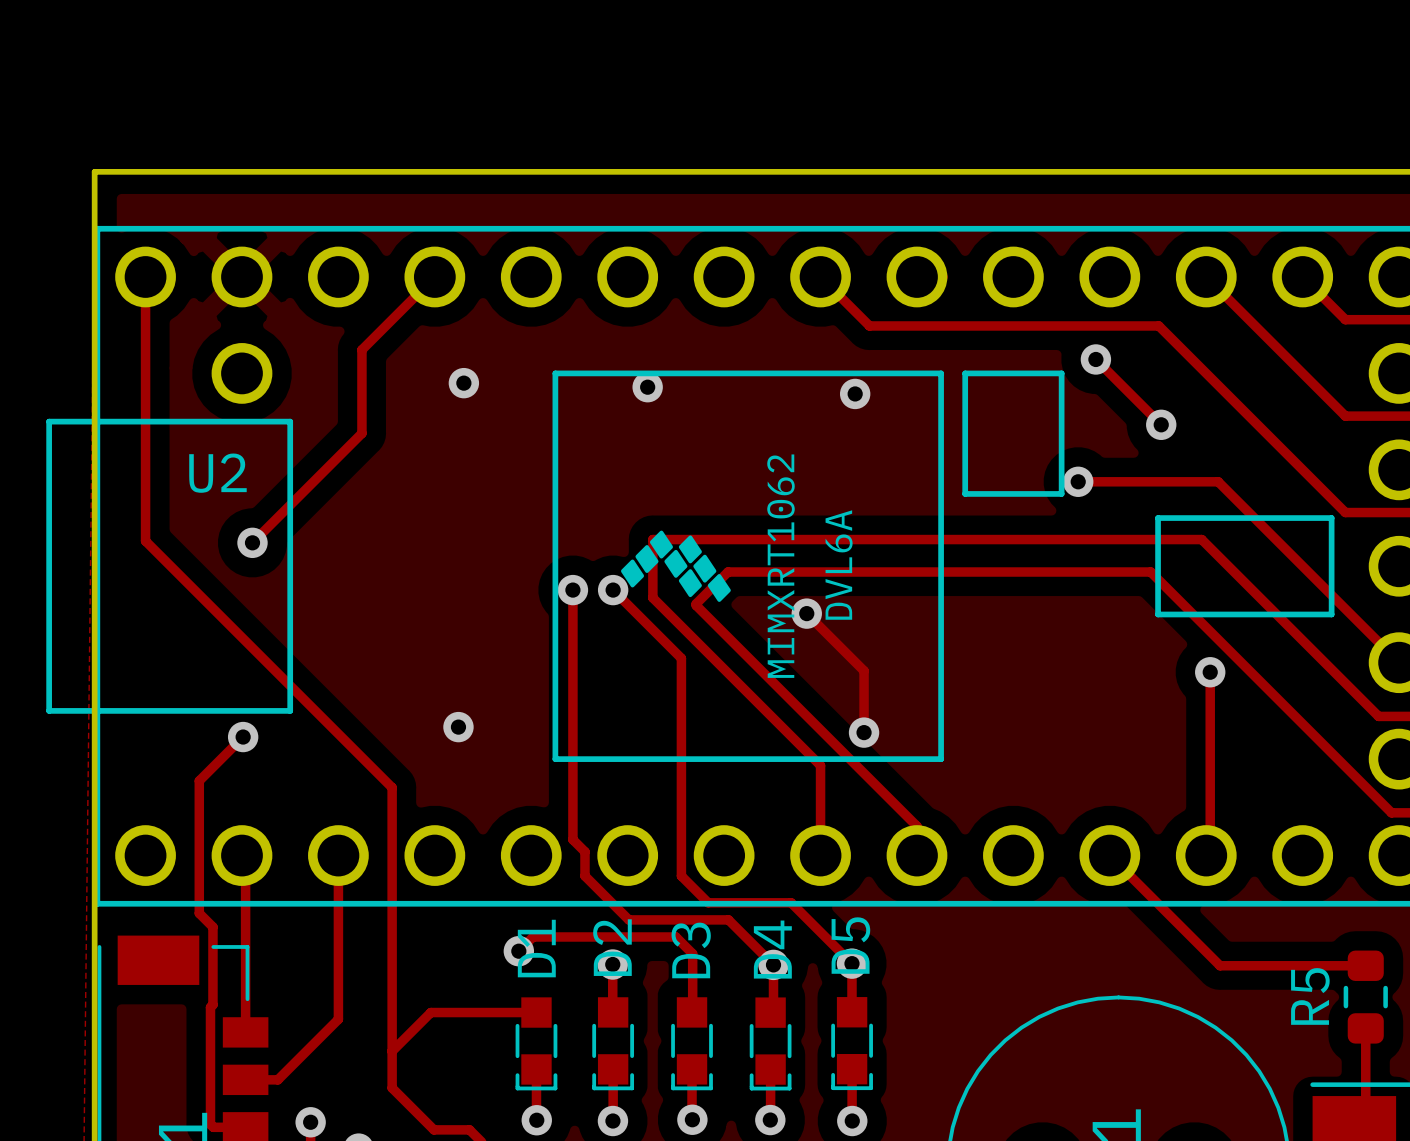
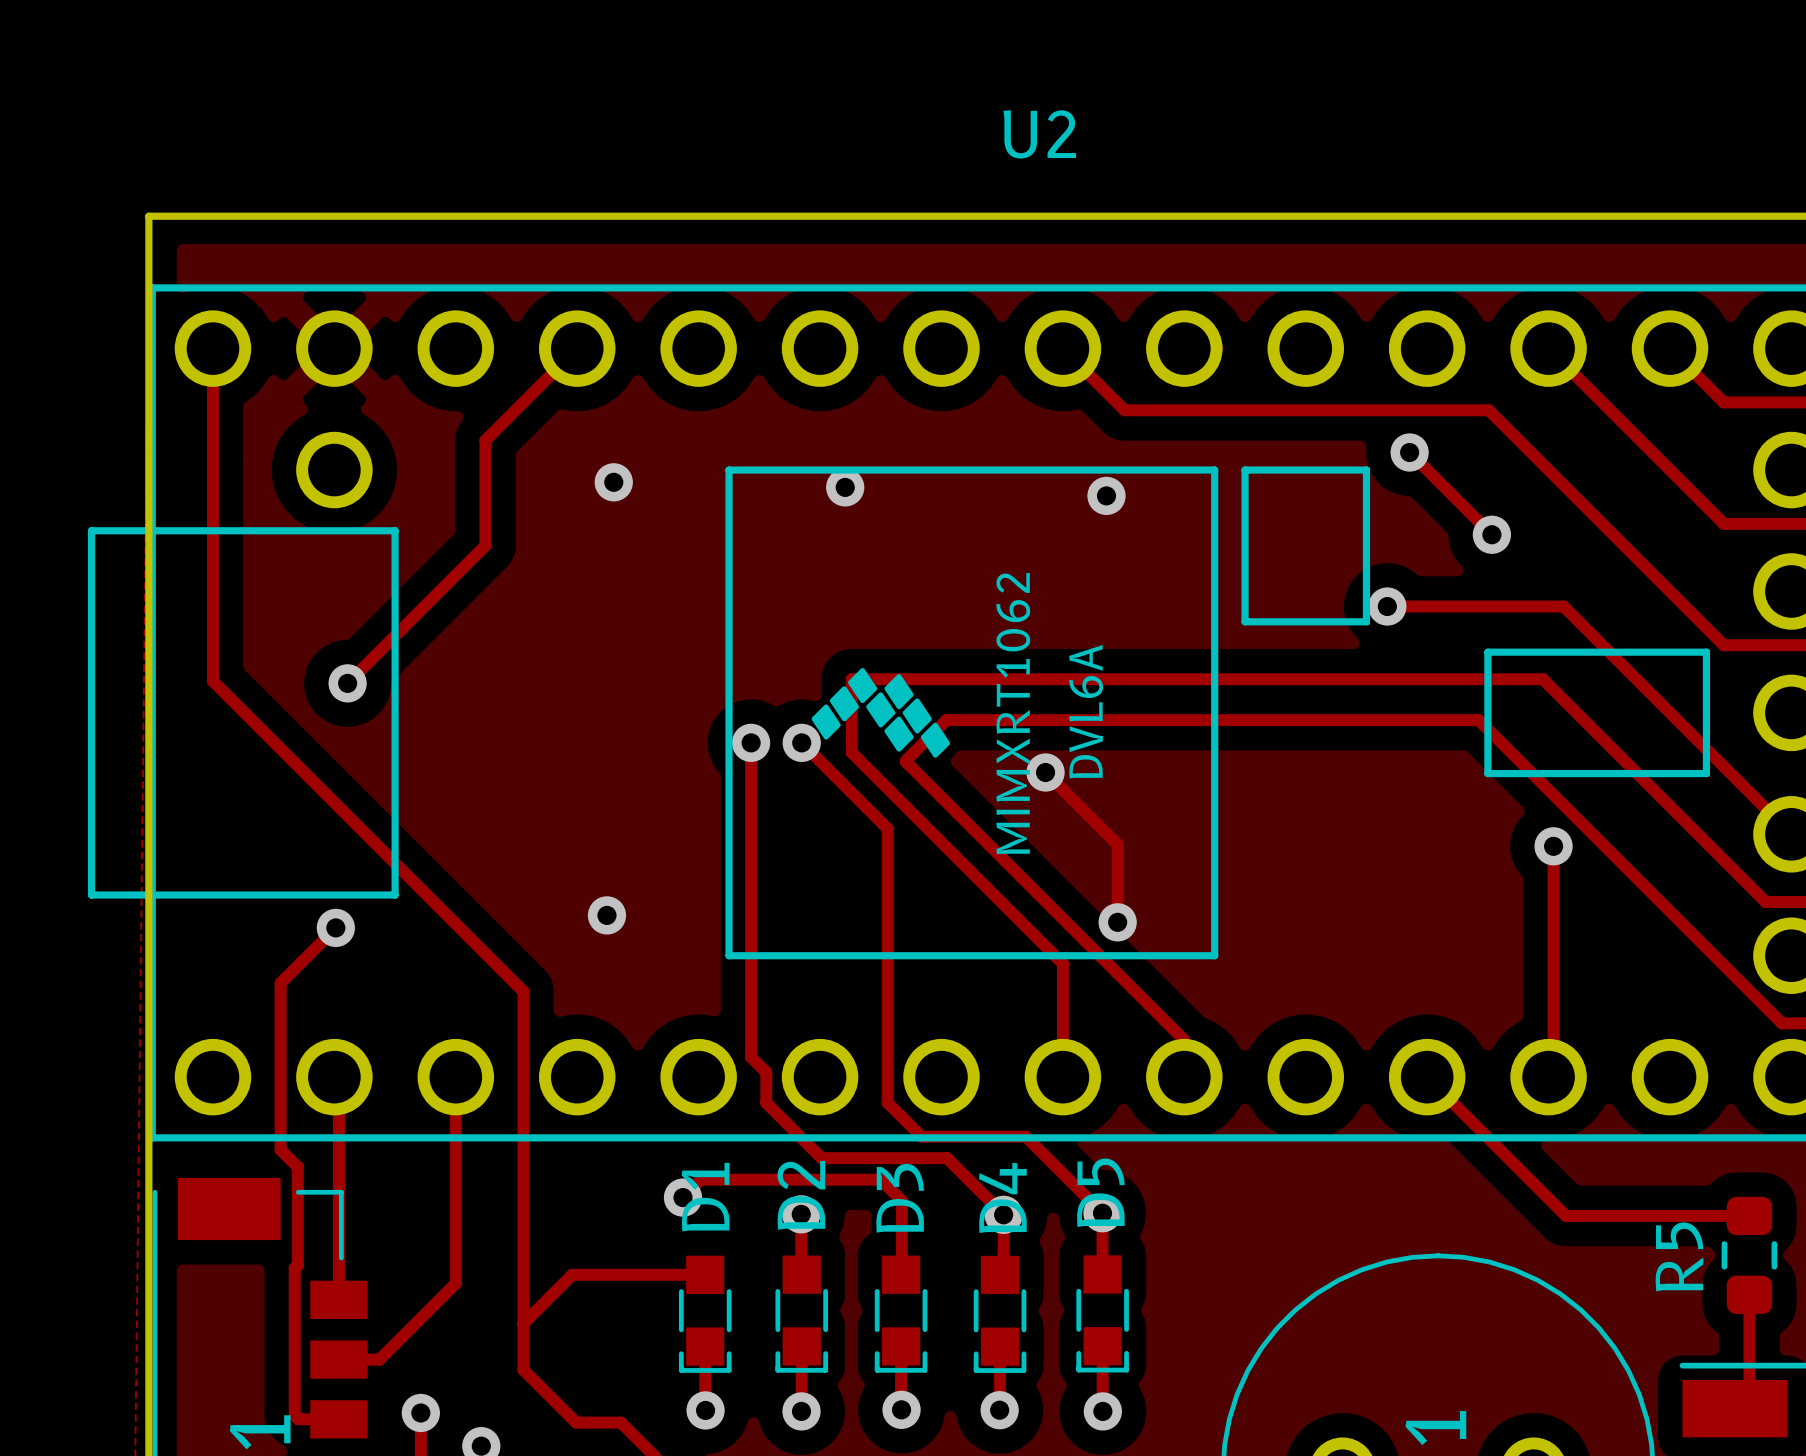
U2 name position: U2 (217, 473) -> U2 (1039, 134)

